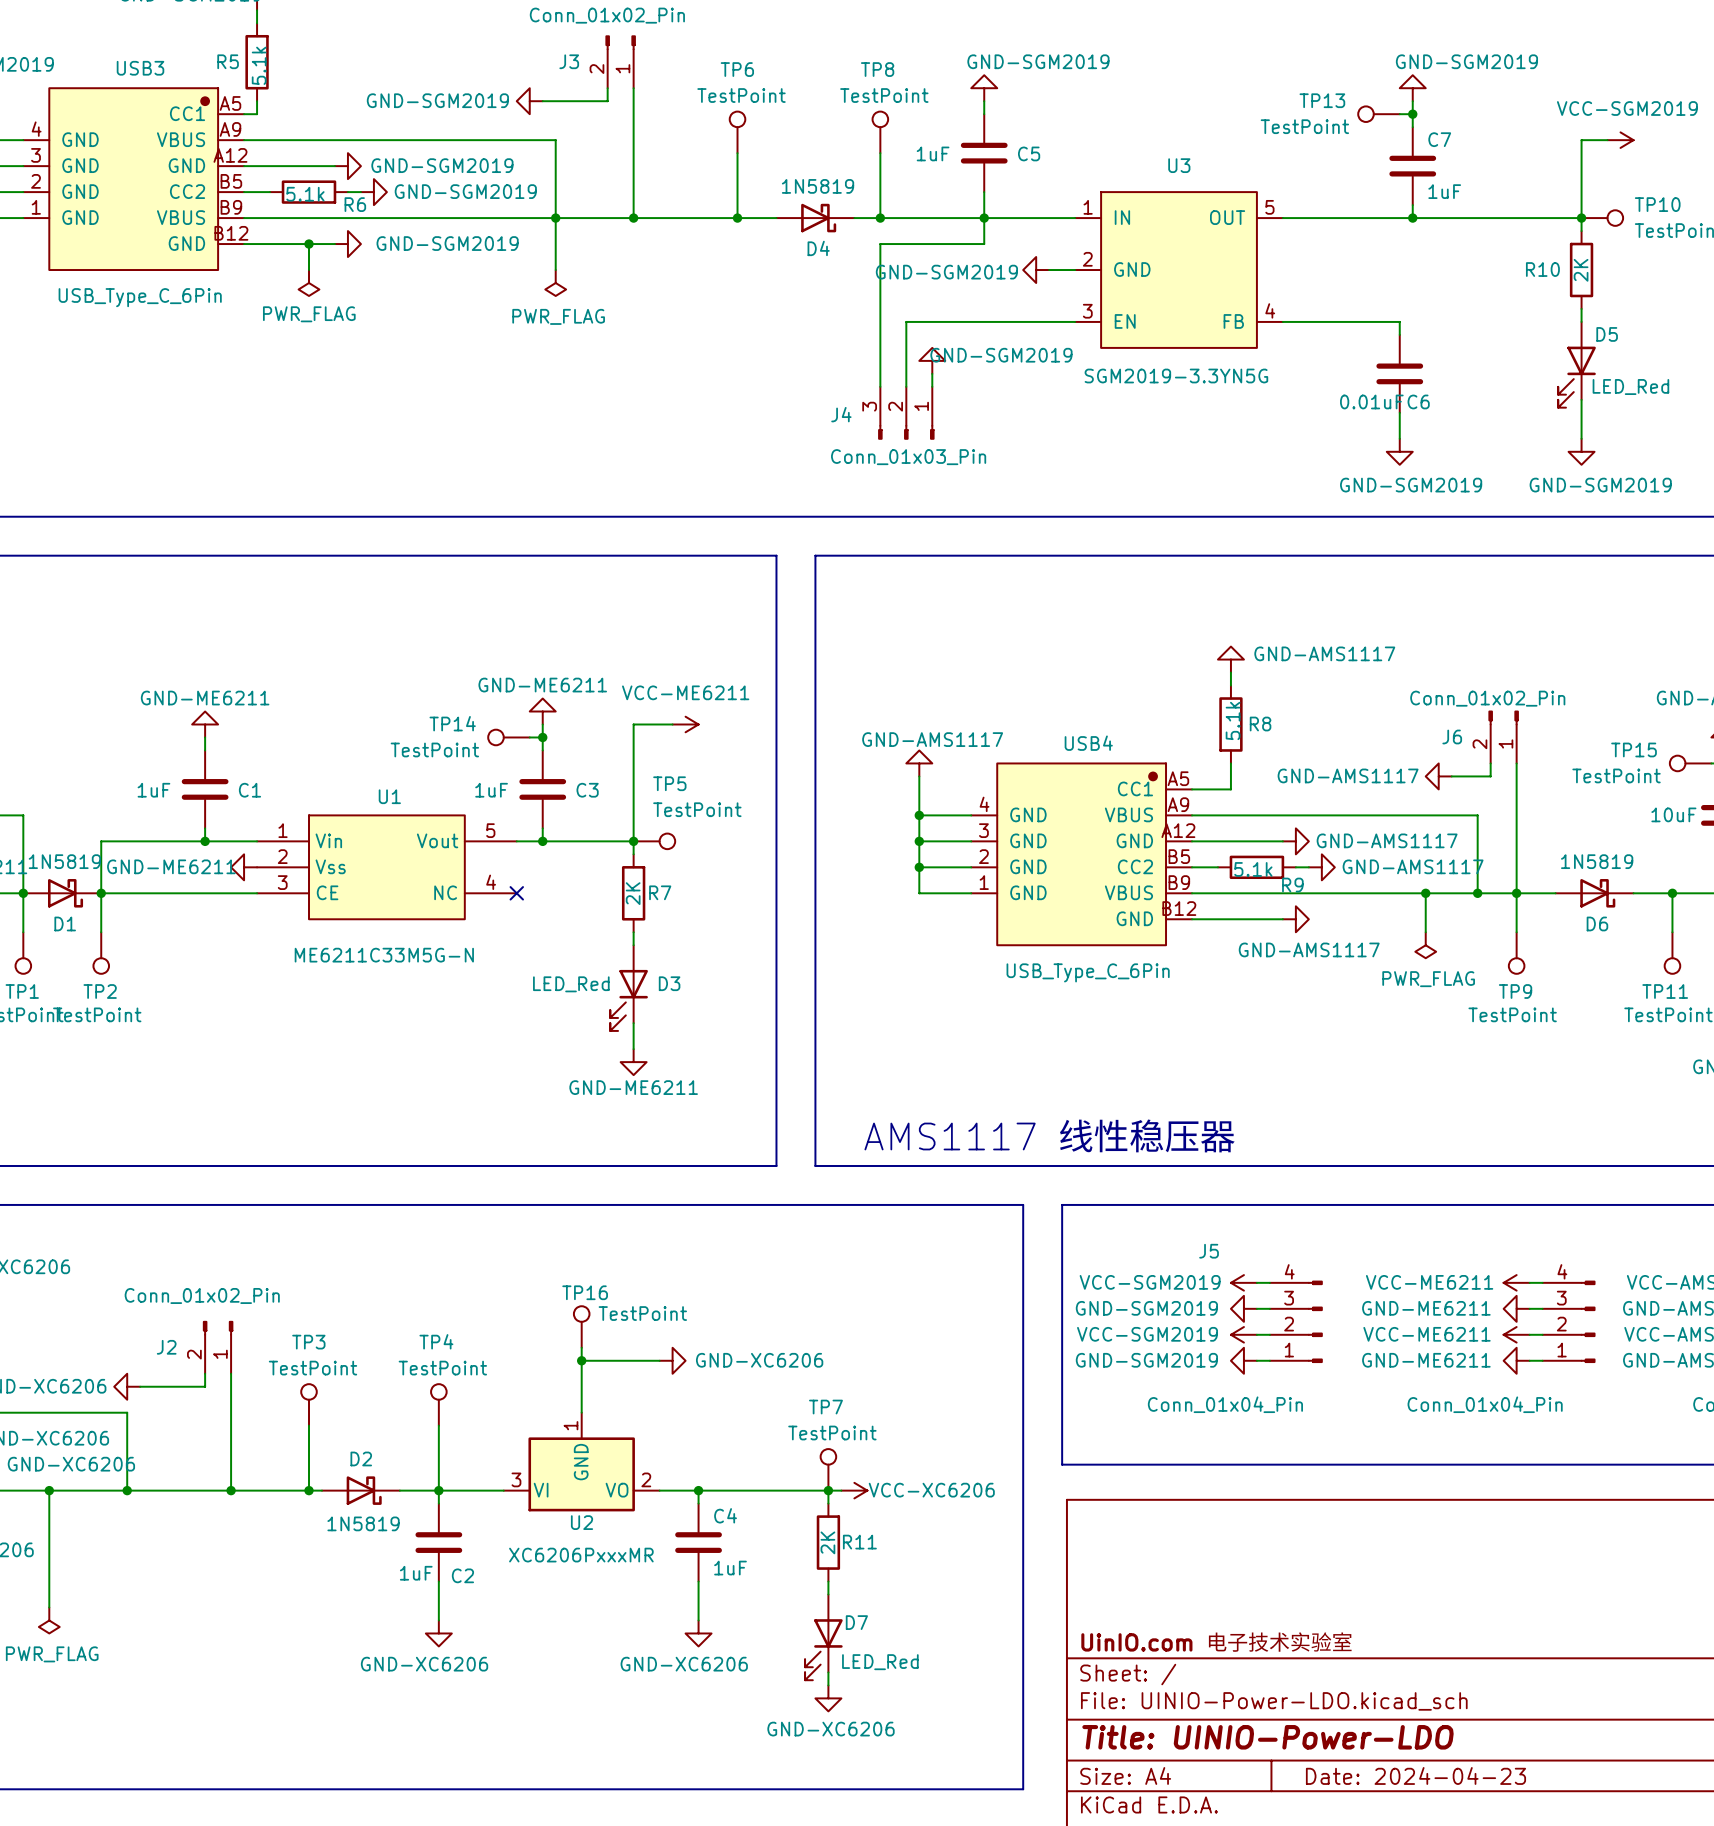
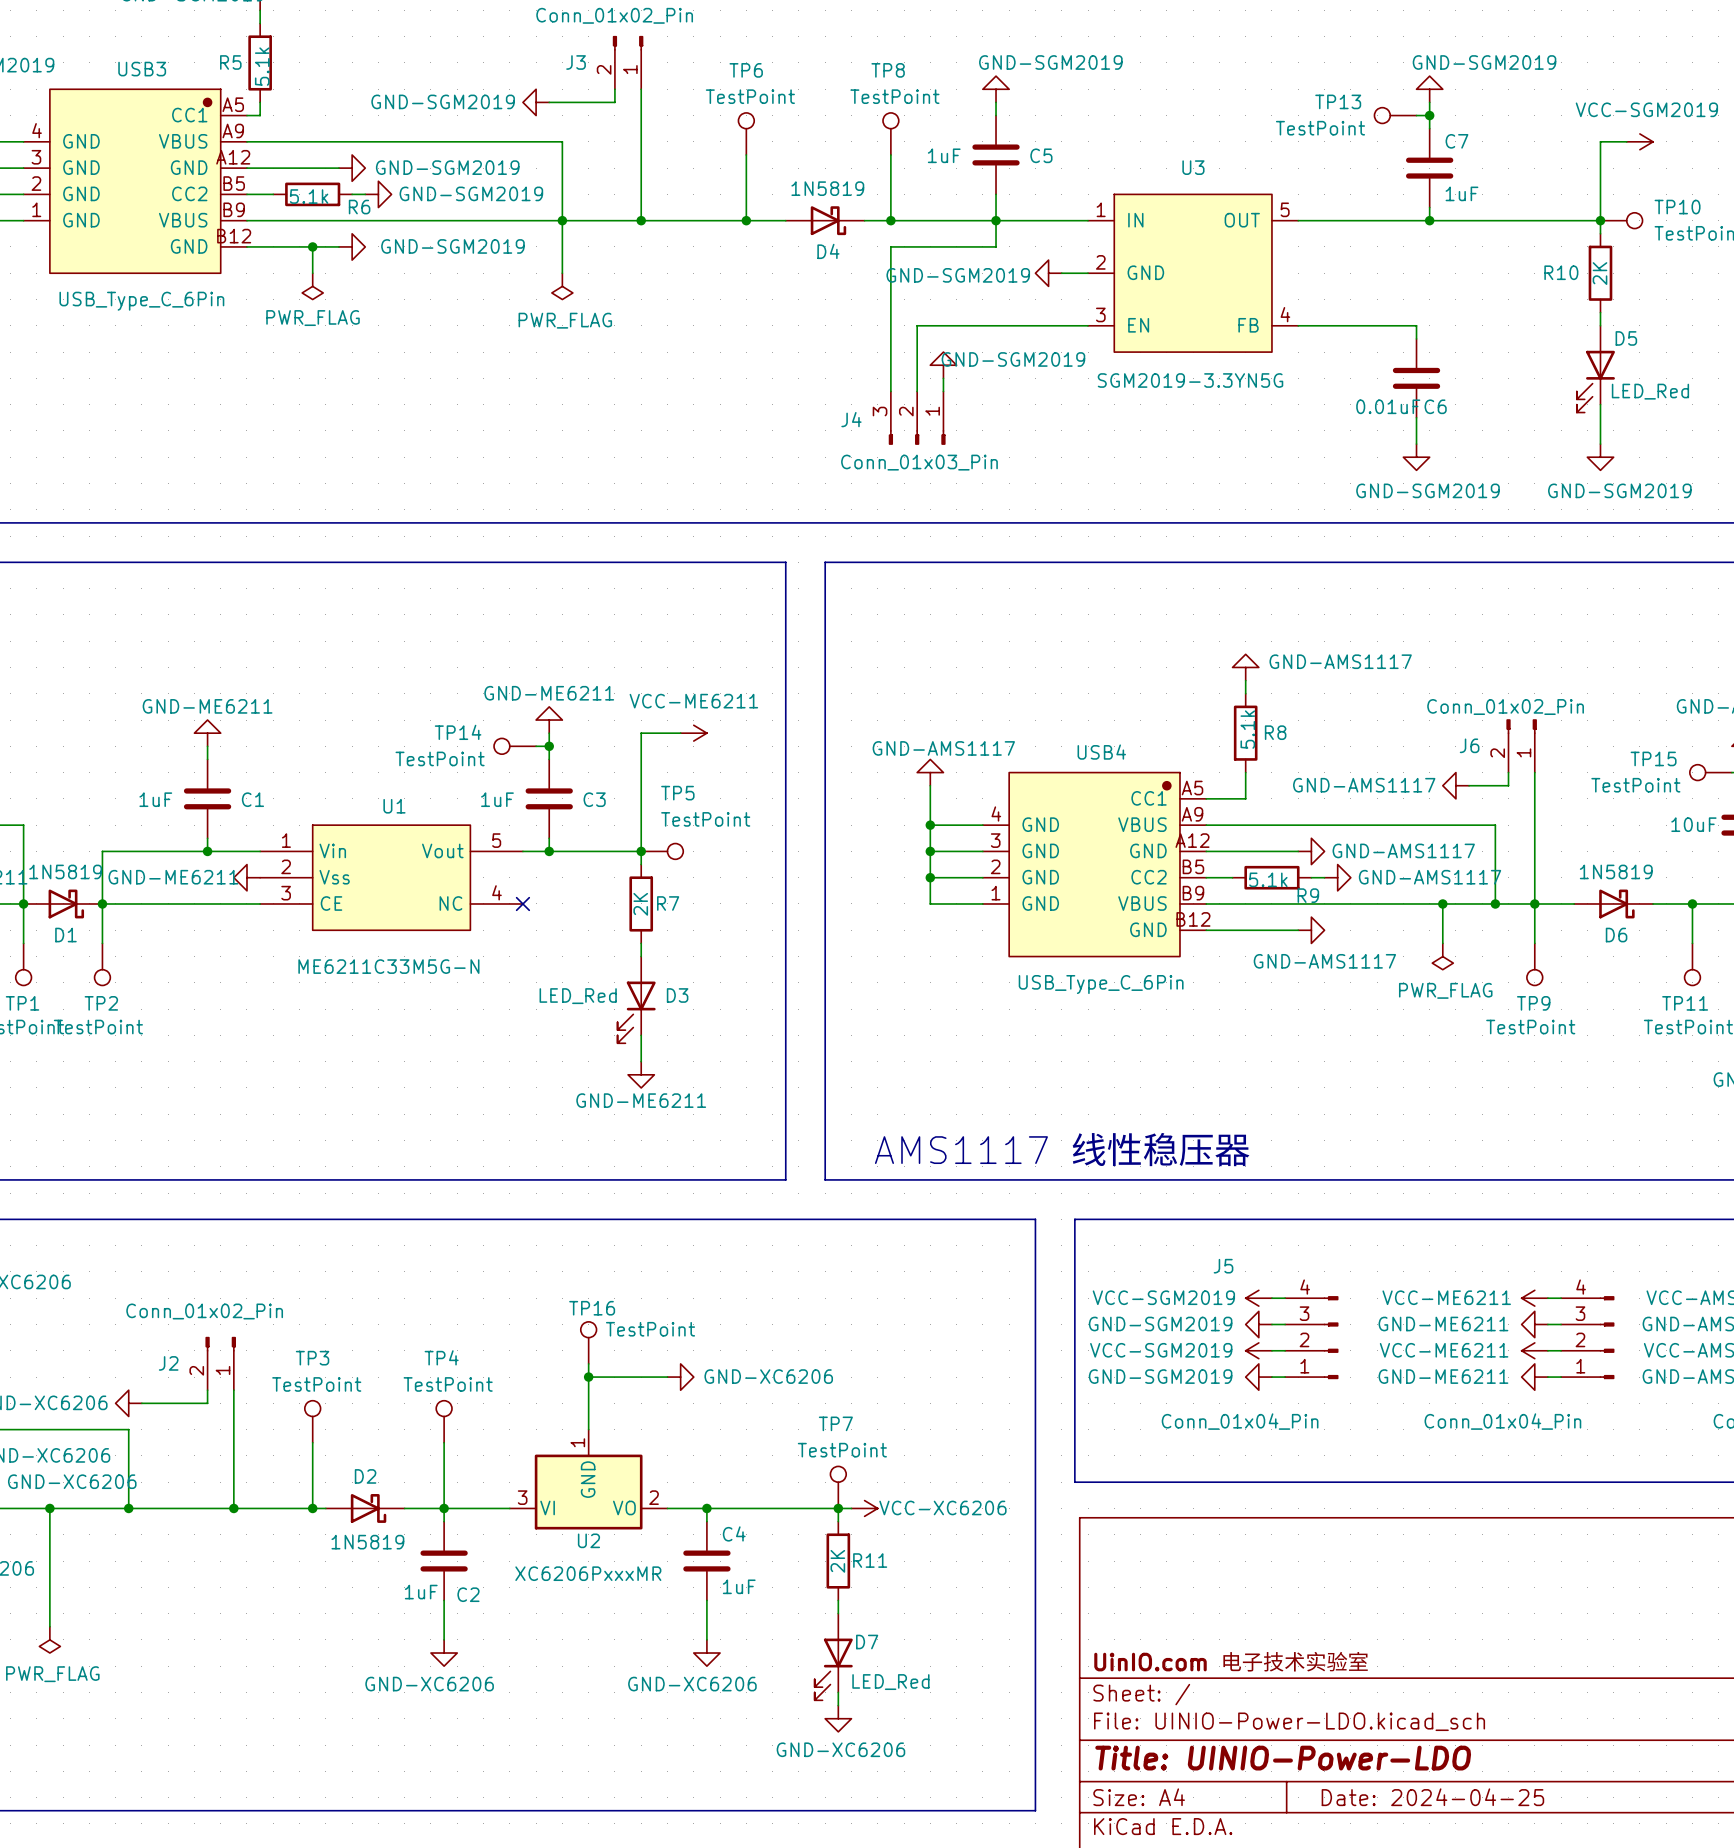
title block: Date: 2024-04-23 (1415, 1775) -> Date: 2024-04-25 (1432, 1797)

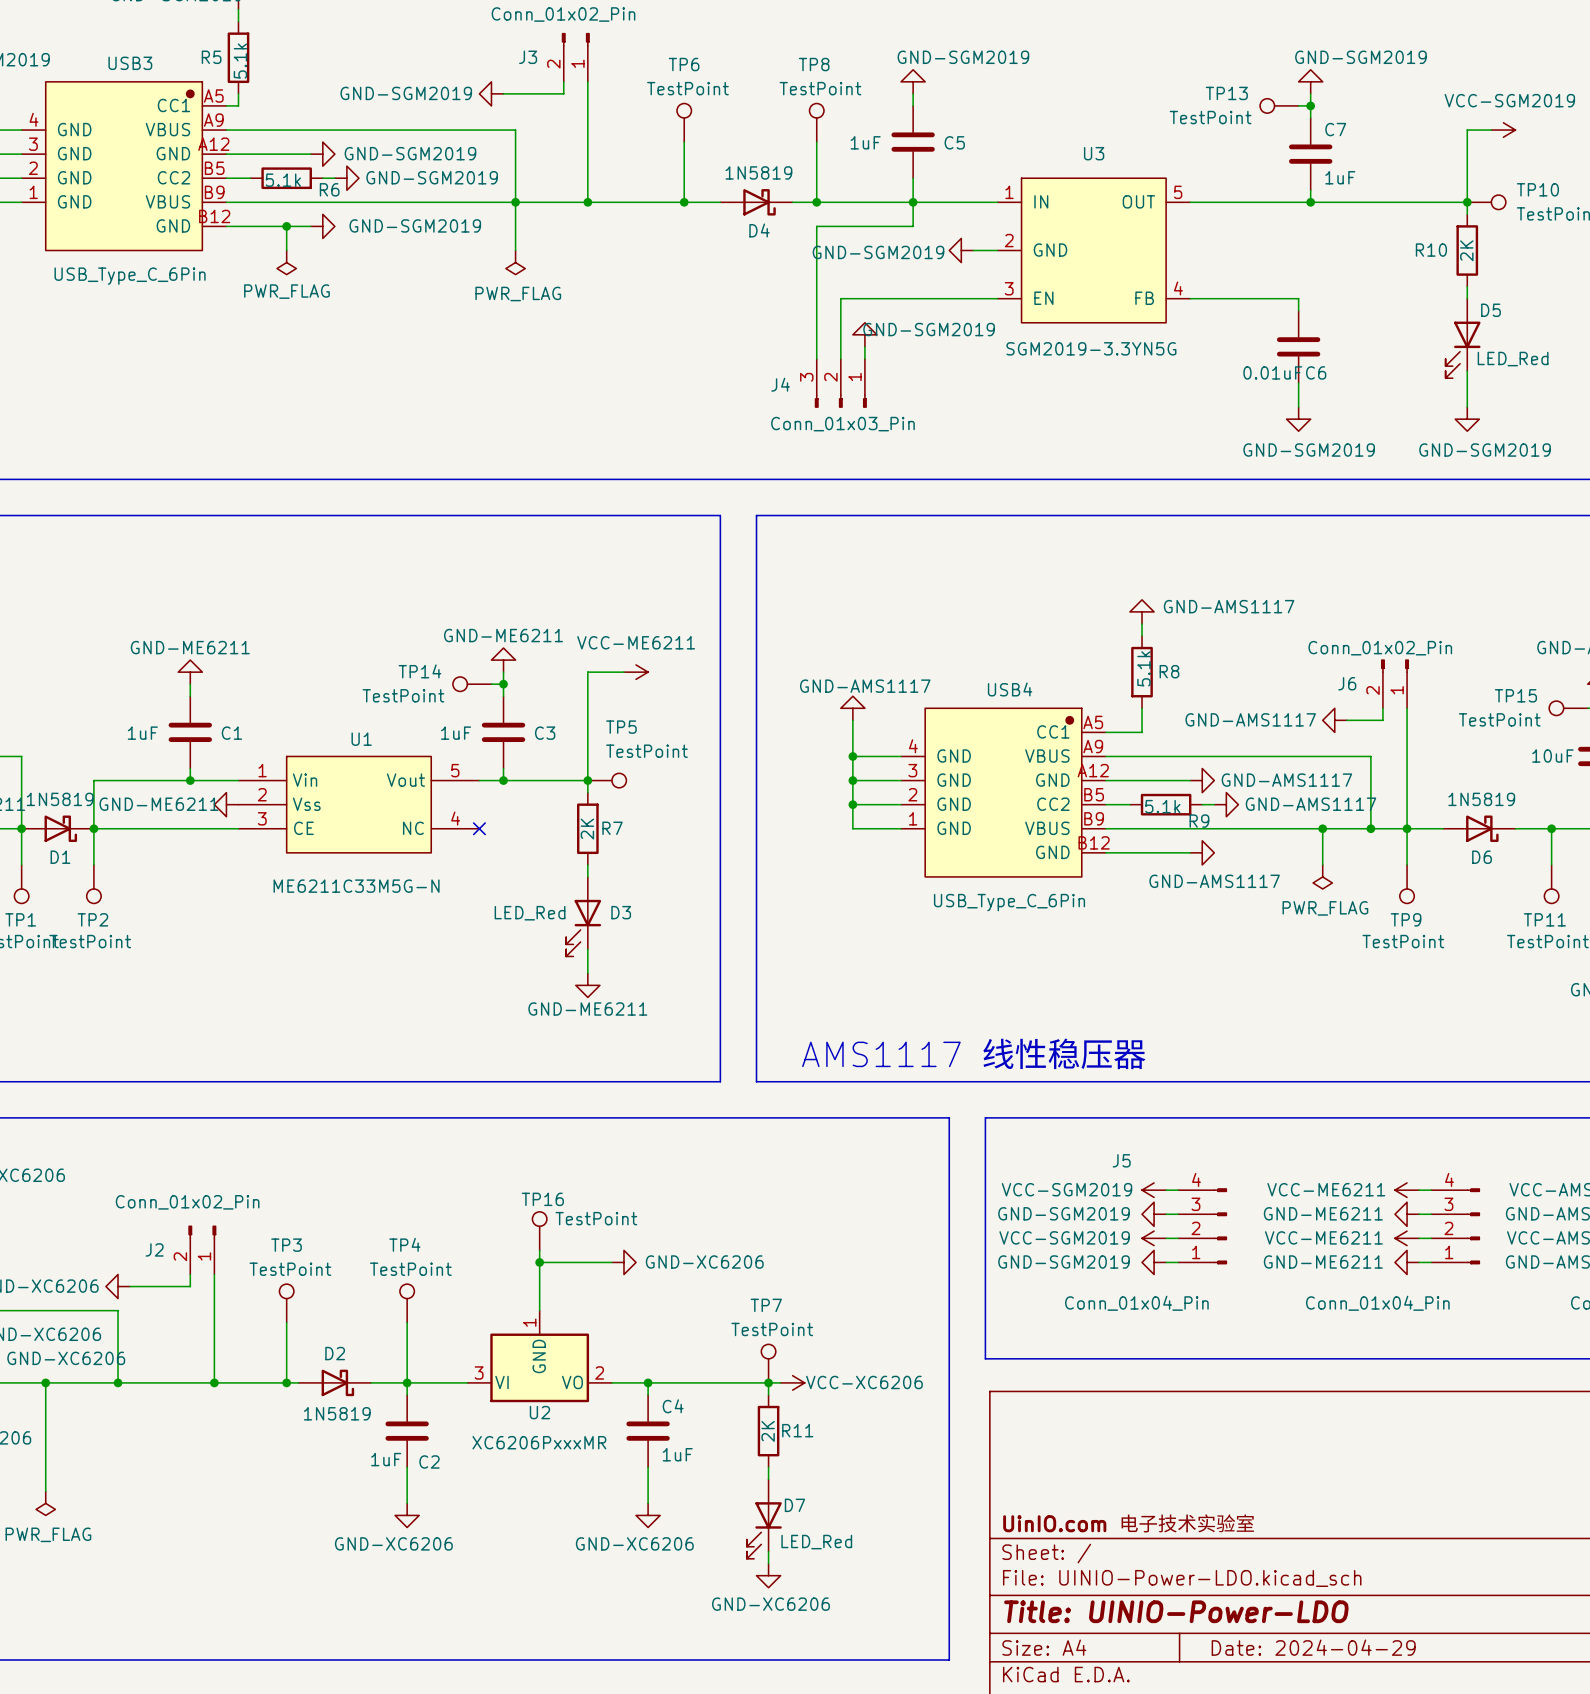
title block: Date: 2024-04-25 (1432, 1797) -> Date: 2024-04-29 (1313, 1647)

